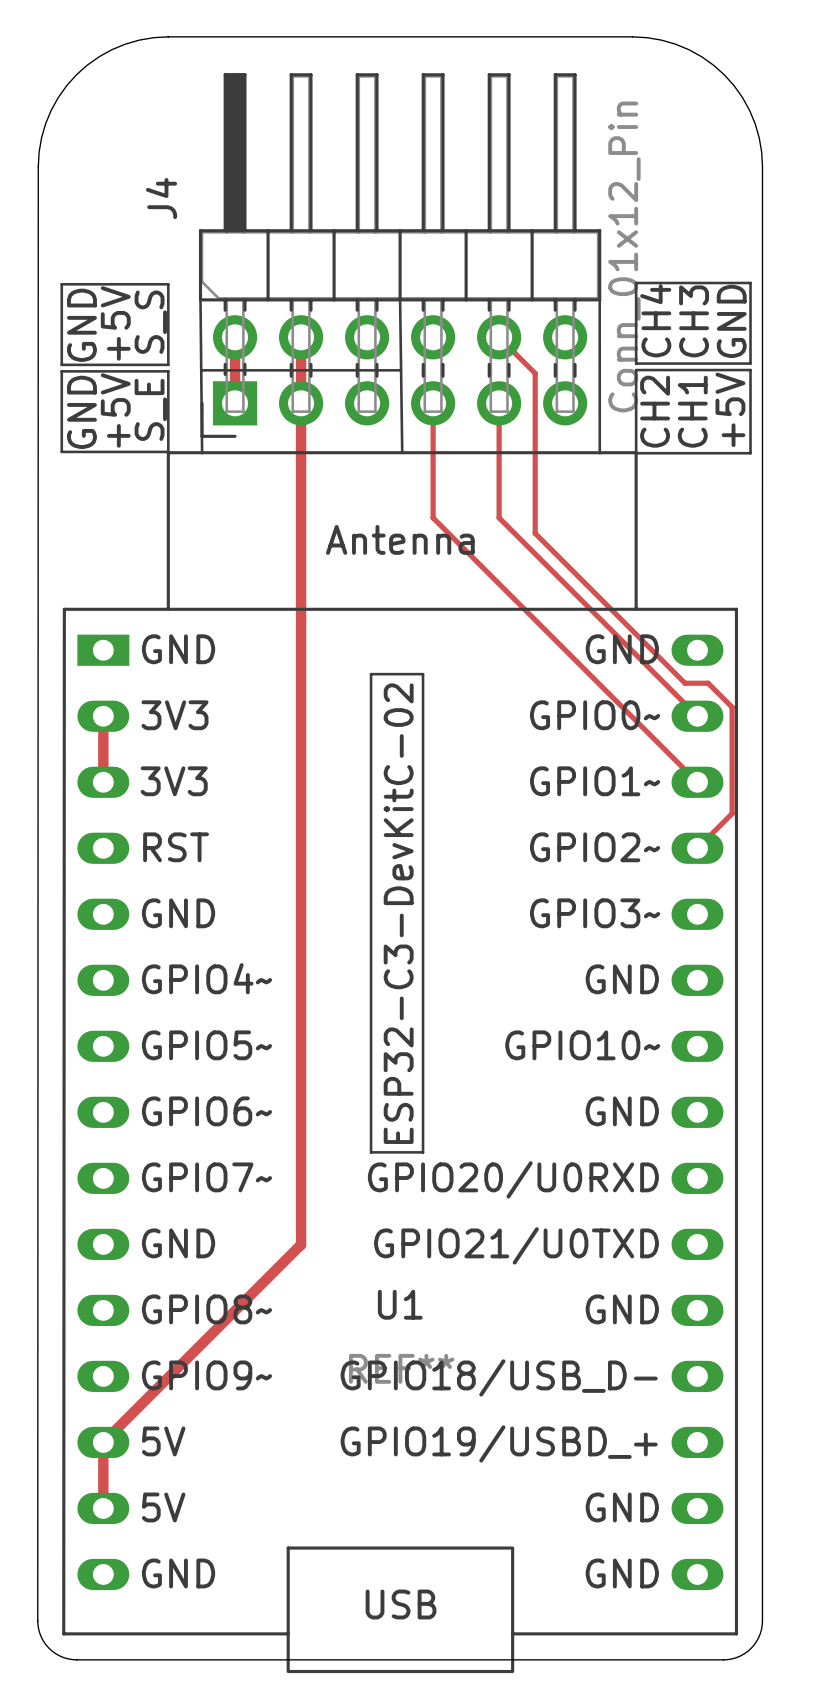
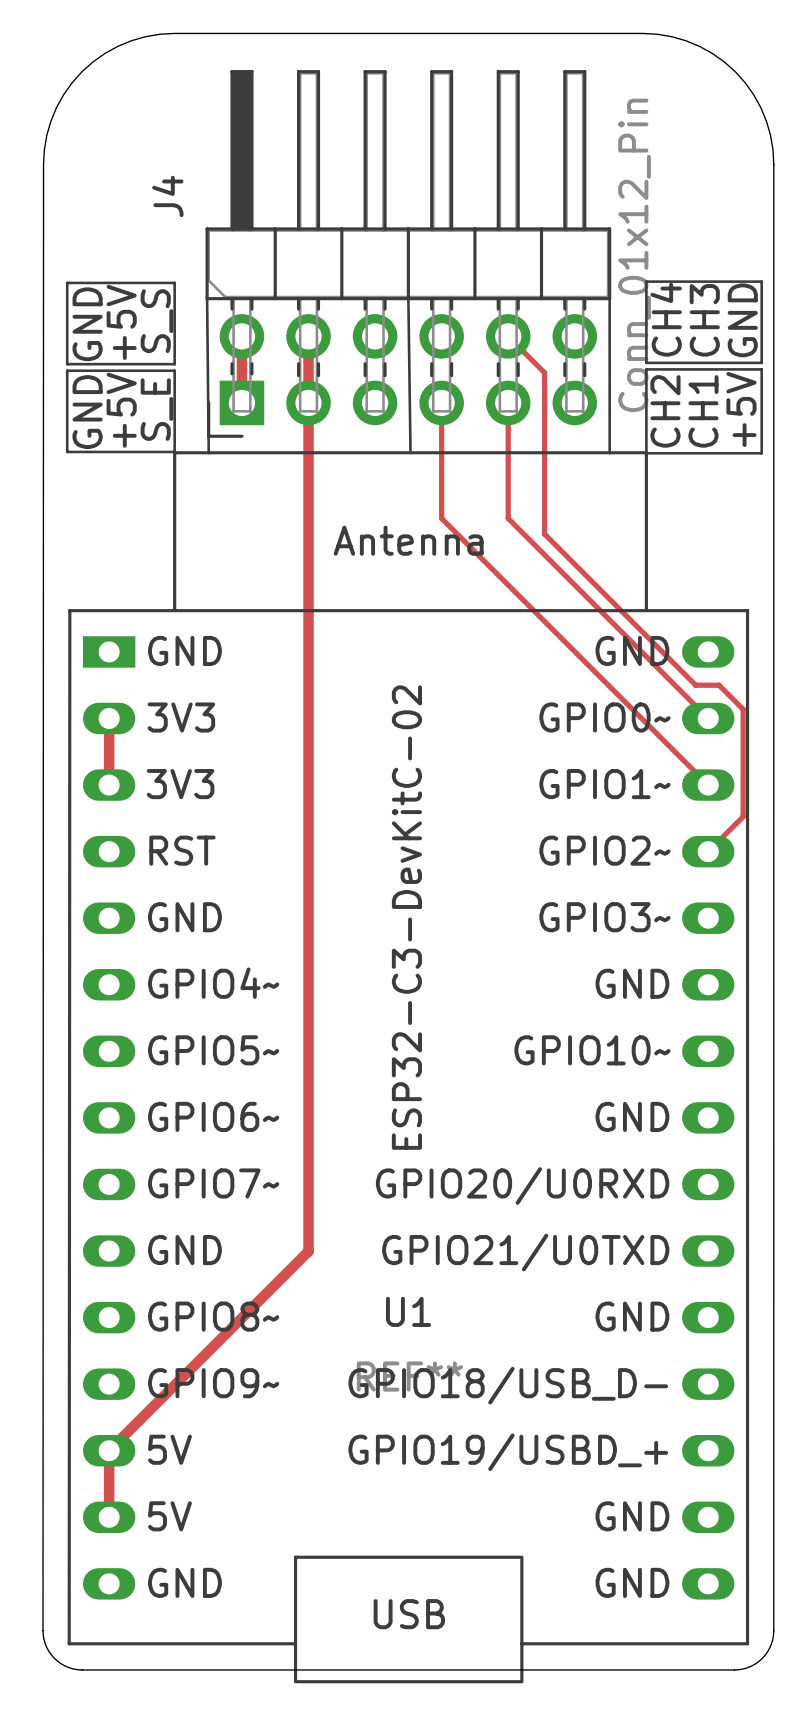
line: (201, 370) (400, 370) -> none
line: (371, 674) (423, 674) (423, 1152) (371, 1152) (371, 674) -> none

